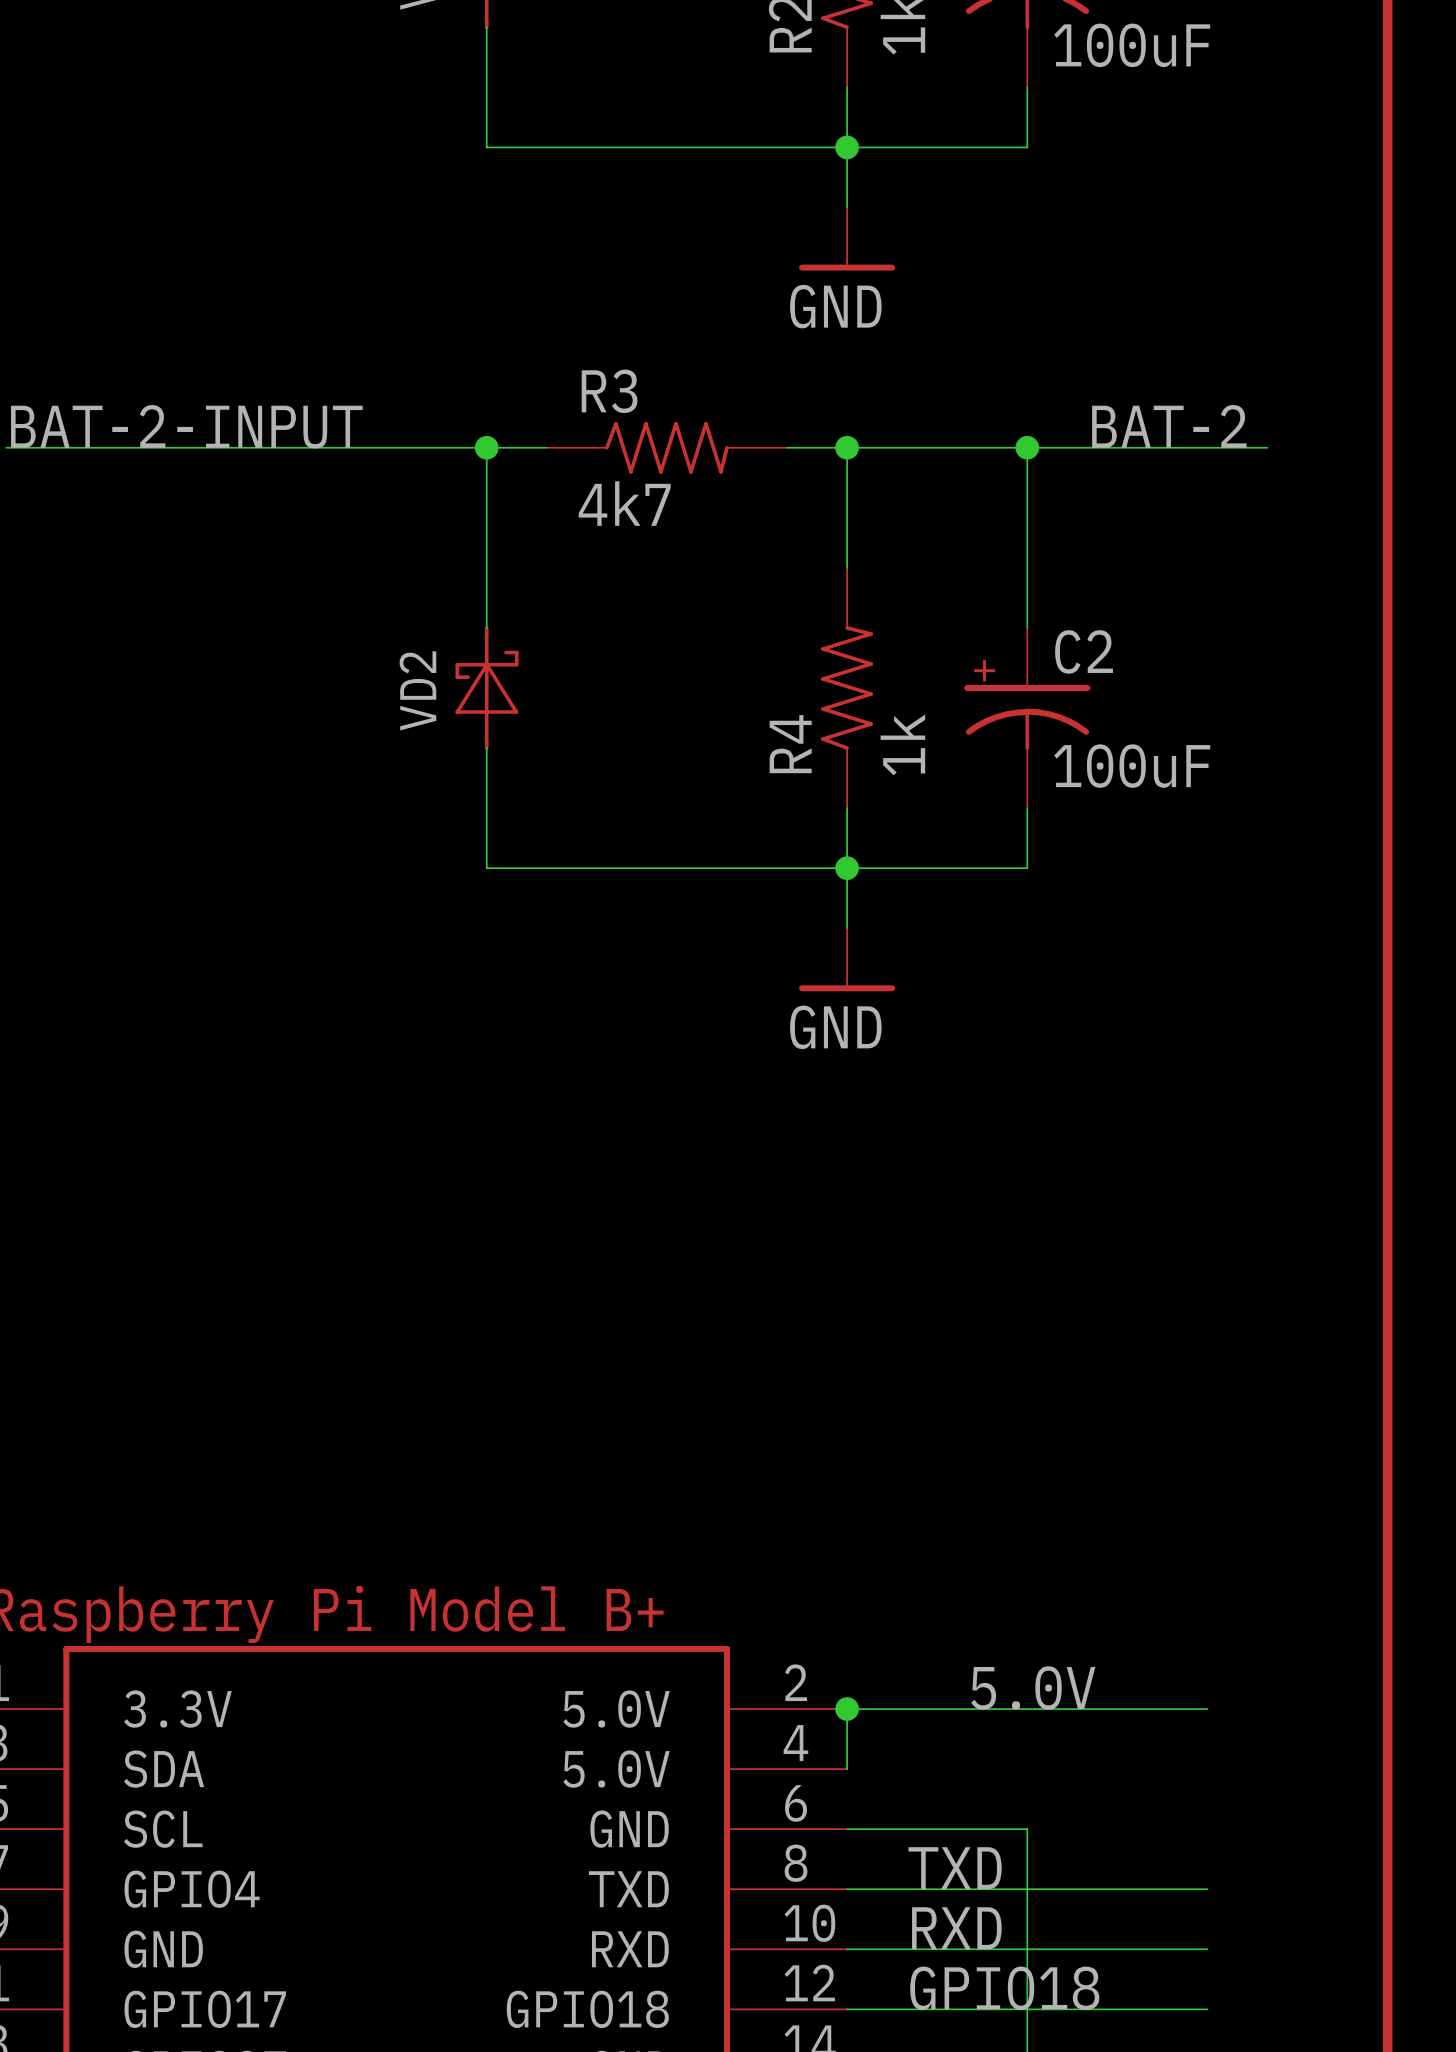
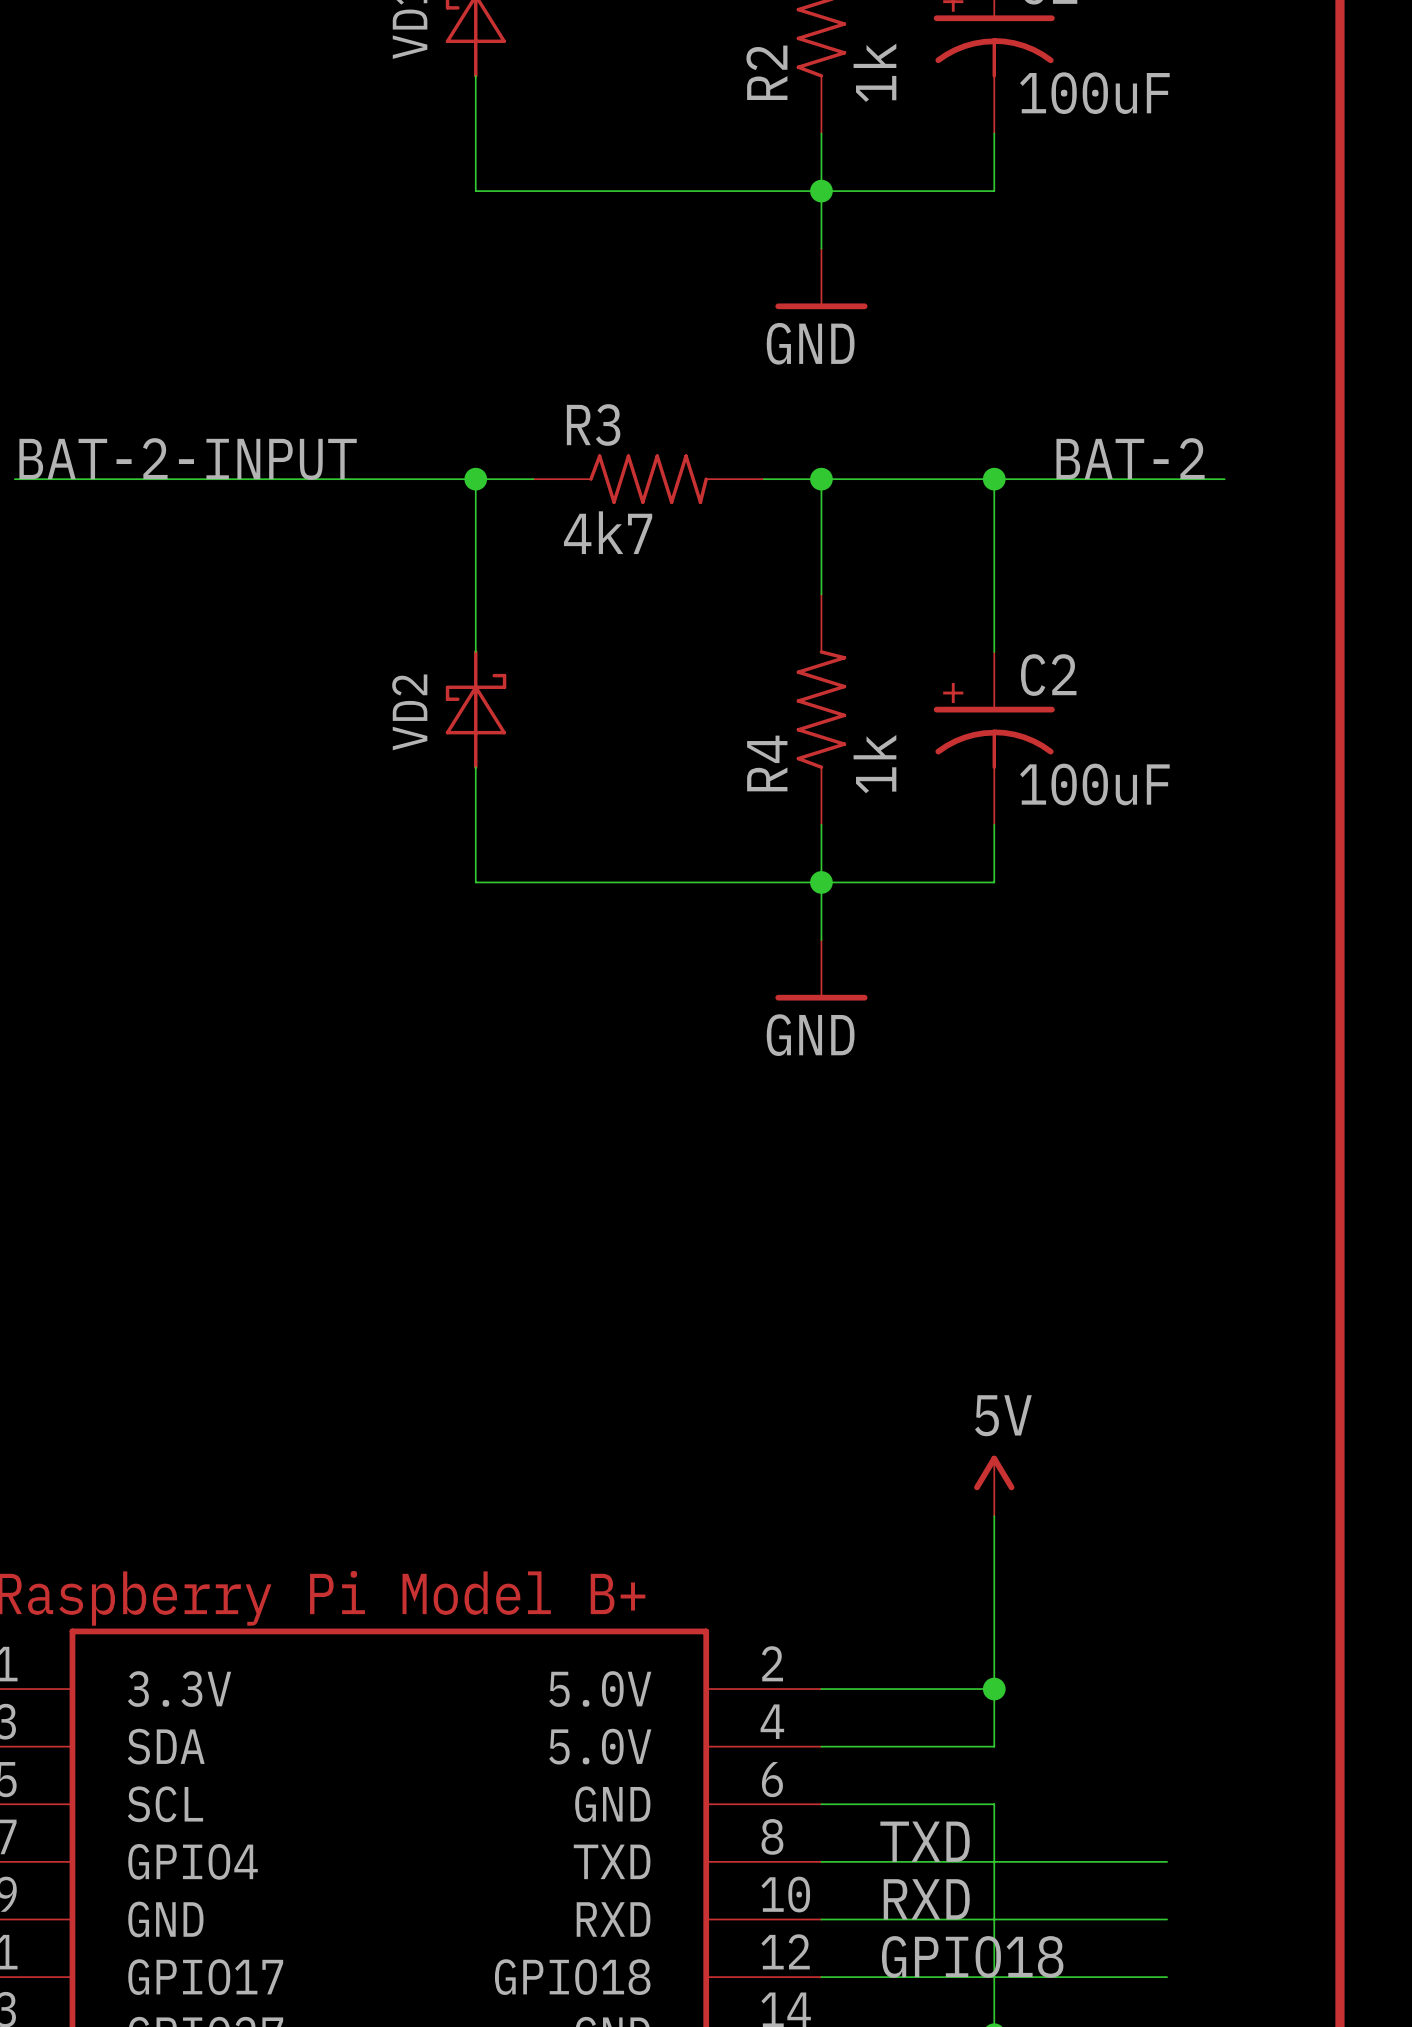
power symbol: none -> 5V (994, 1485)
label: 5.0V (1033, 1688) -> none
wire: (847, 1709) (847, 1769) -> (994, 1516) (994, 1746) (821, 1746)
junction: (847, 1709) -> none
wire: (1027, 1709) (1207, 1709) -> none
junction: none -> (994, 1689)

